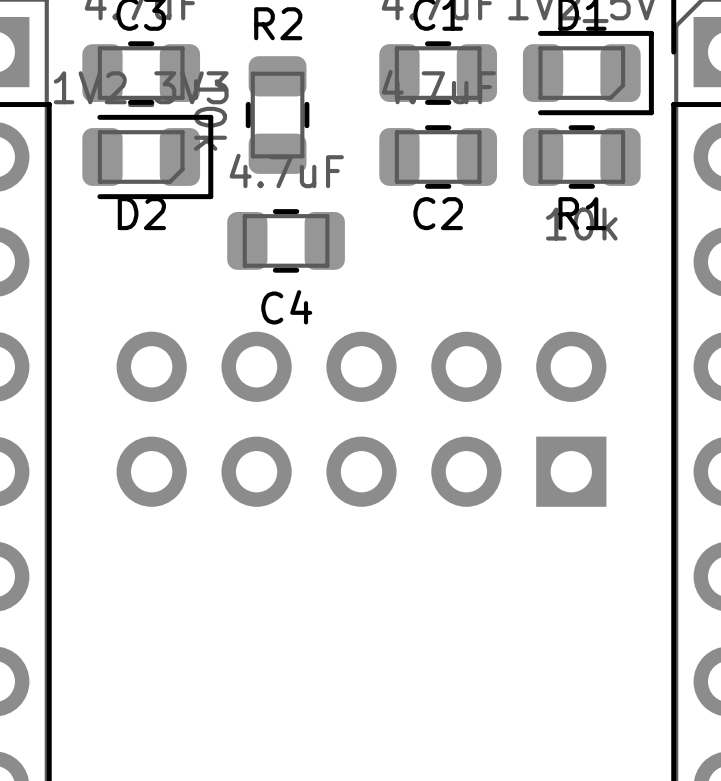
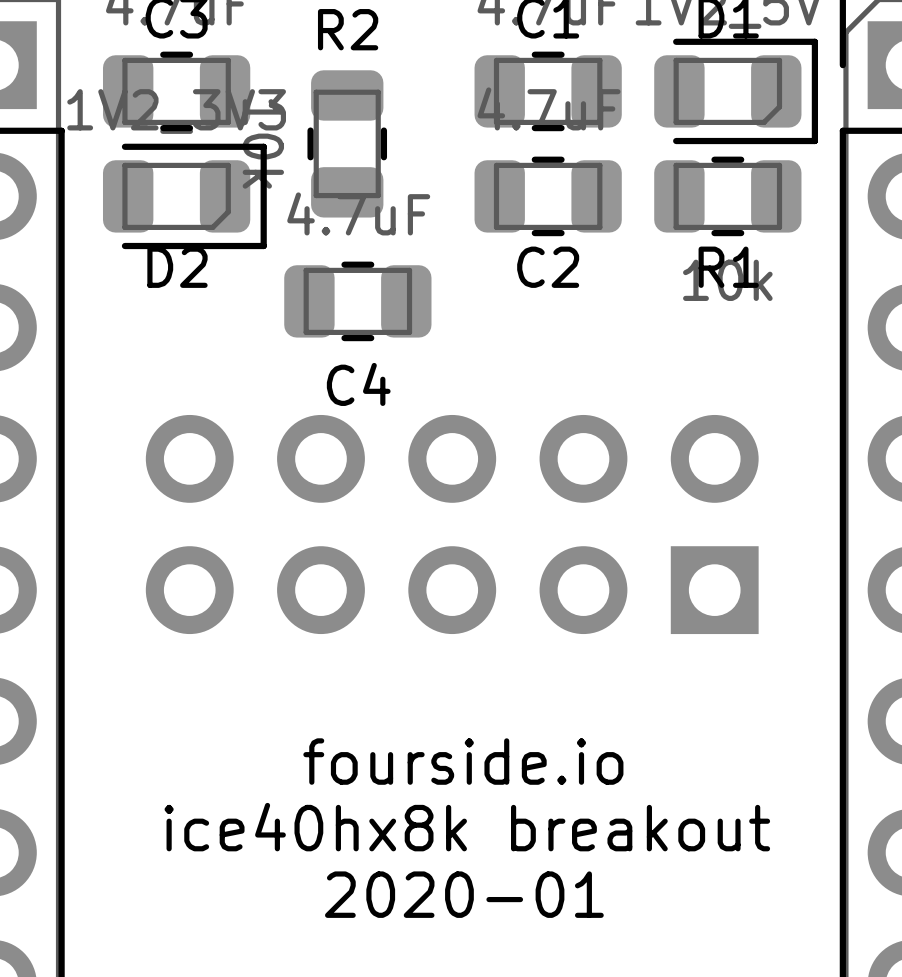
text: none -> fourside.io (463, 761)
text: none -> ice40hx8k breakout (467, 827)
text: none -> 2020-01 (464, 894)

